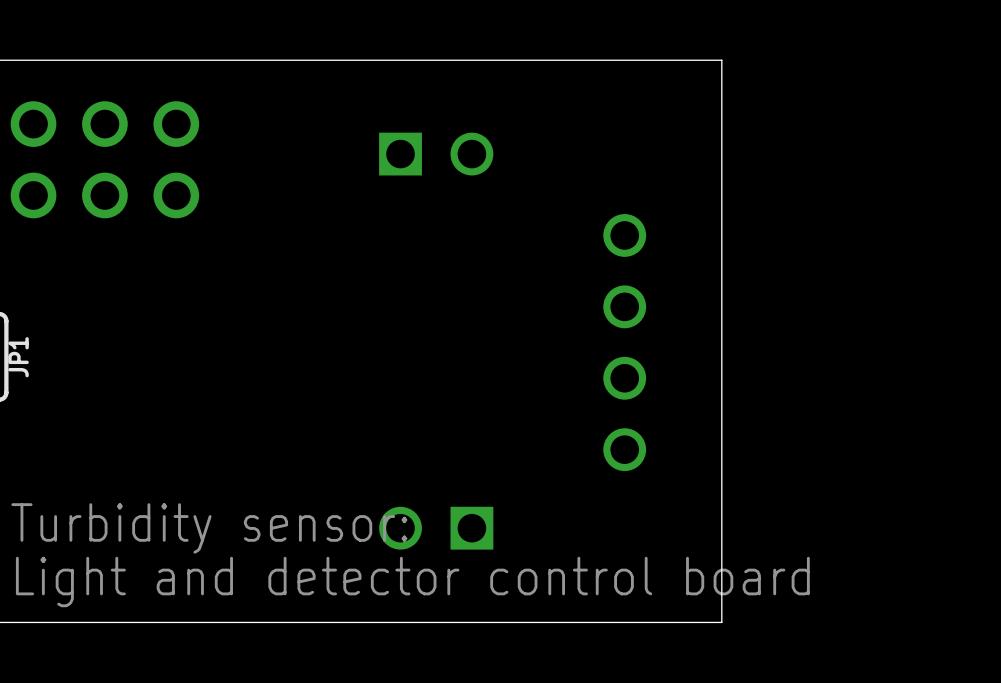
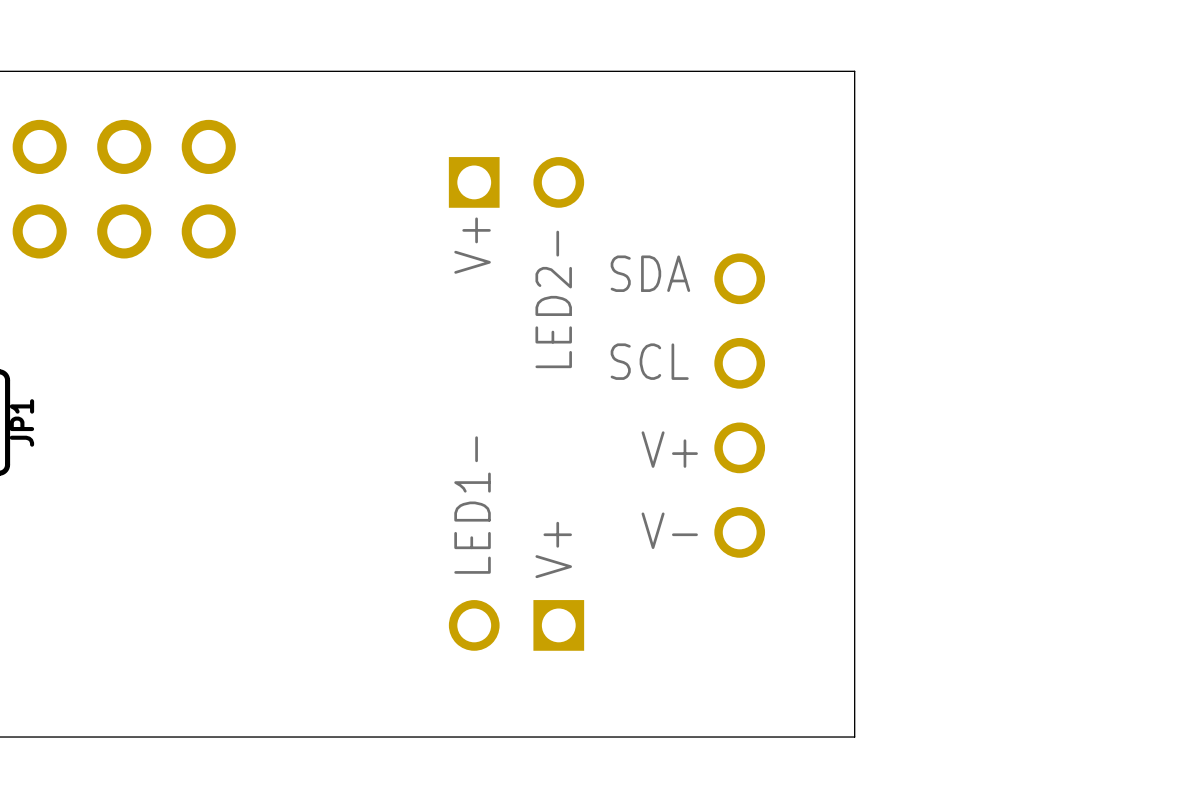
text: none -> V+ (472, 245)
text: none -> SDA (650, 273)
text: none -> LED2- (553, 299)
text: none -> SCL (649, 361)
text: none -> V+ (669, 449)
text: none -> LED1- (472, 505)
text: none -> V- (669, 530)
text: none -> V+ (553, 549)
text: Turbidity sensor: (209, 528) -> none
text: Light and detector control board (412, 581) -> none

